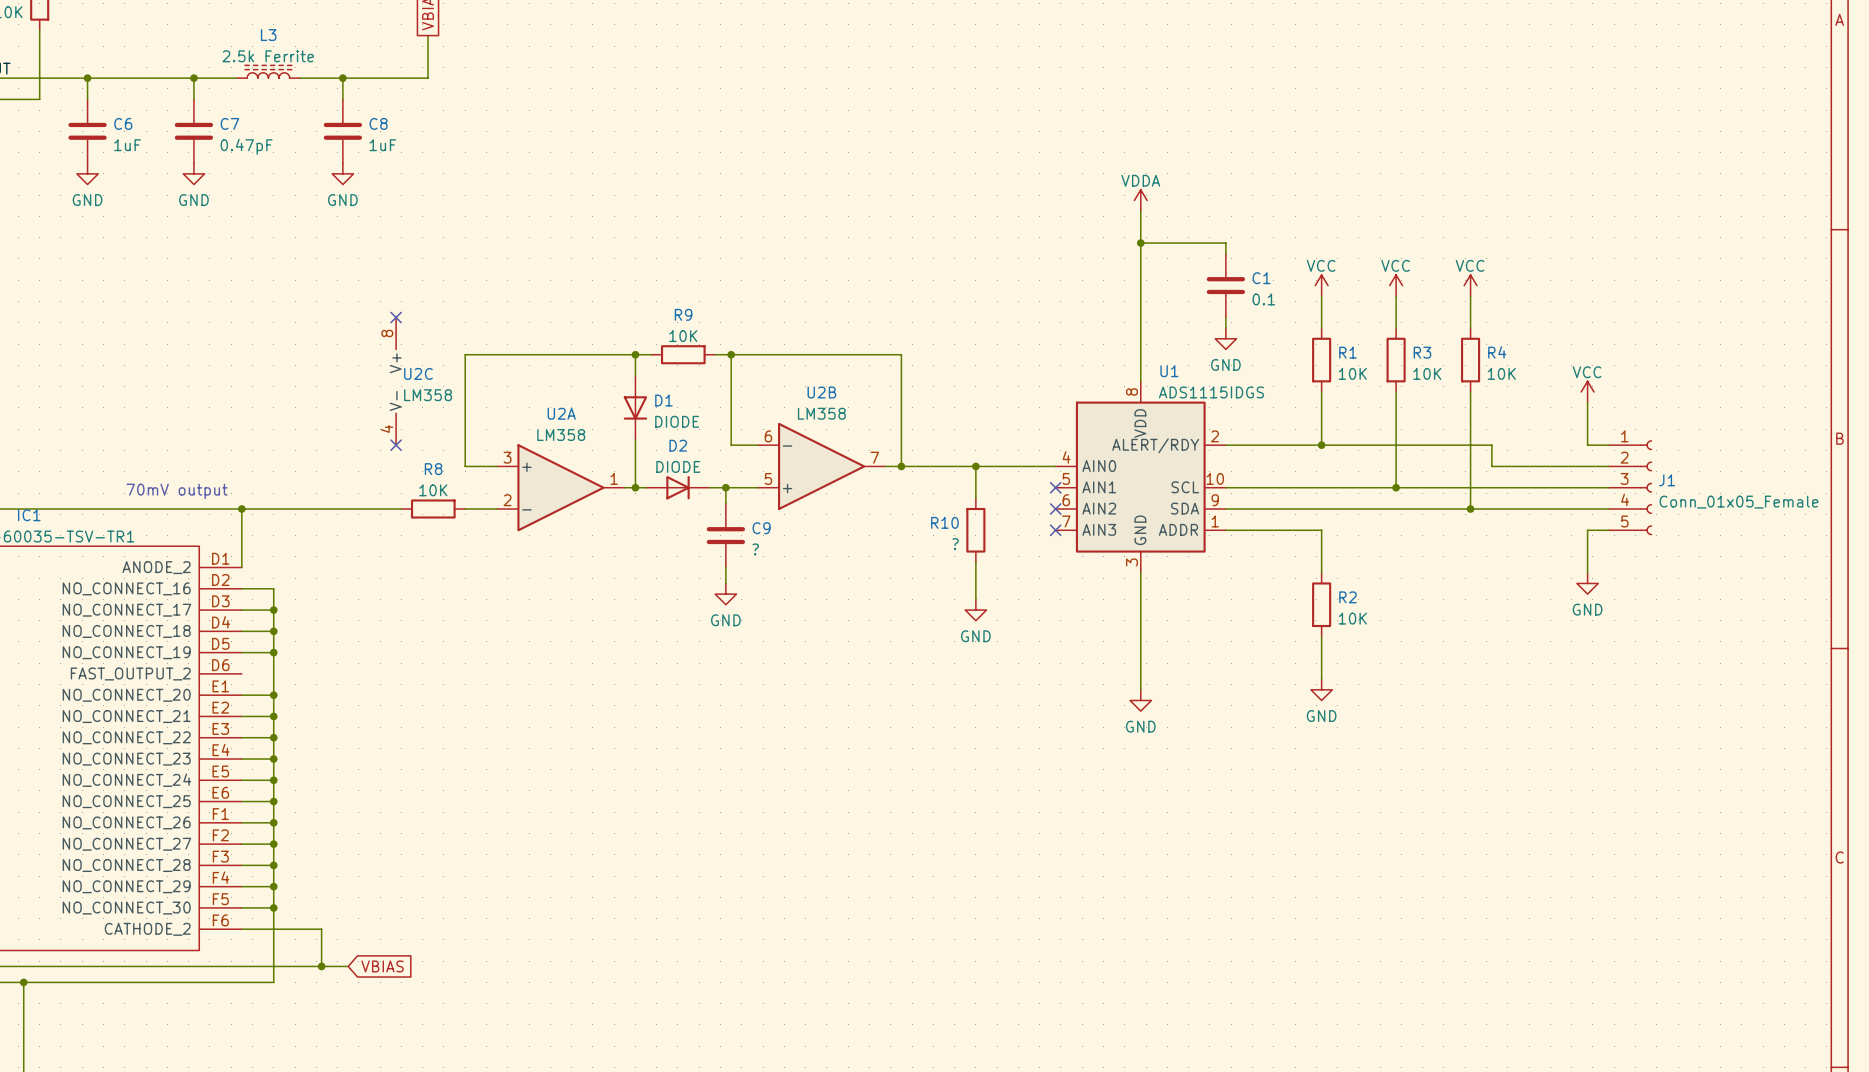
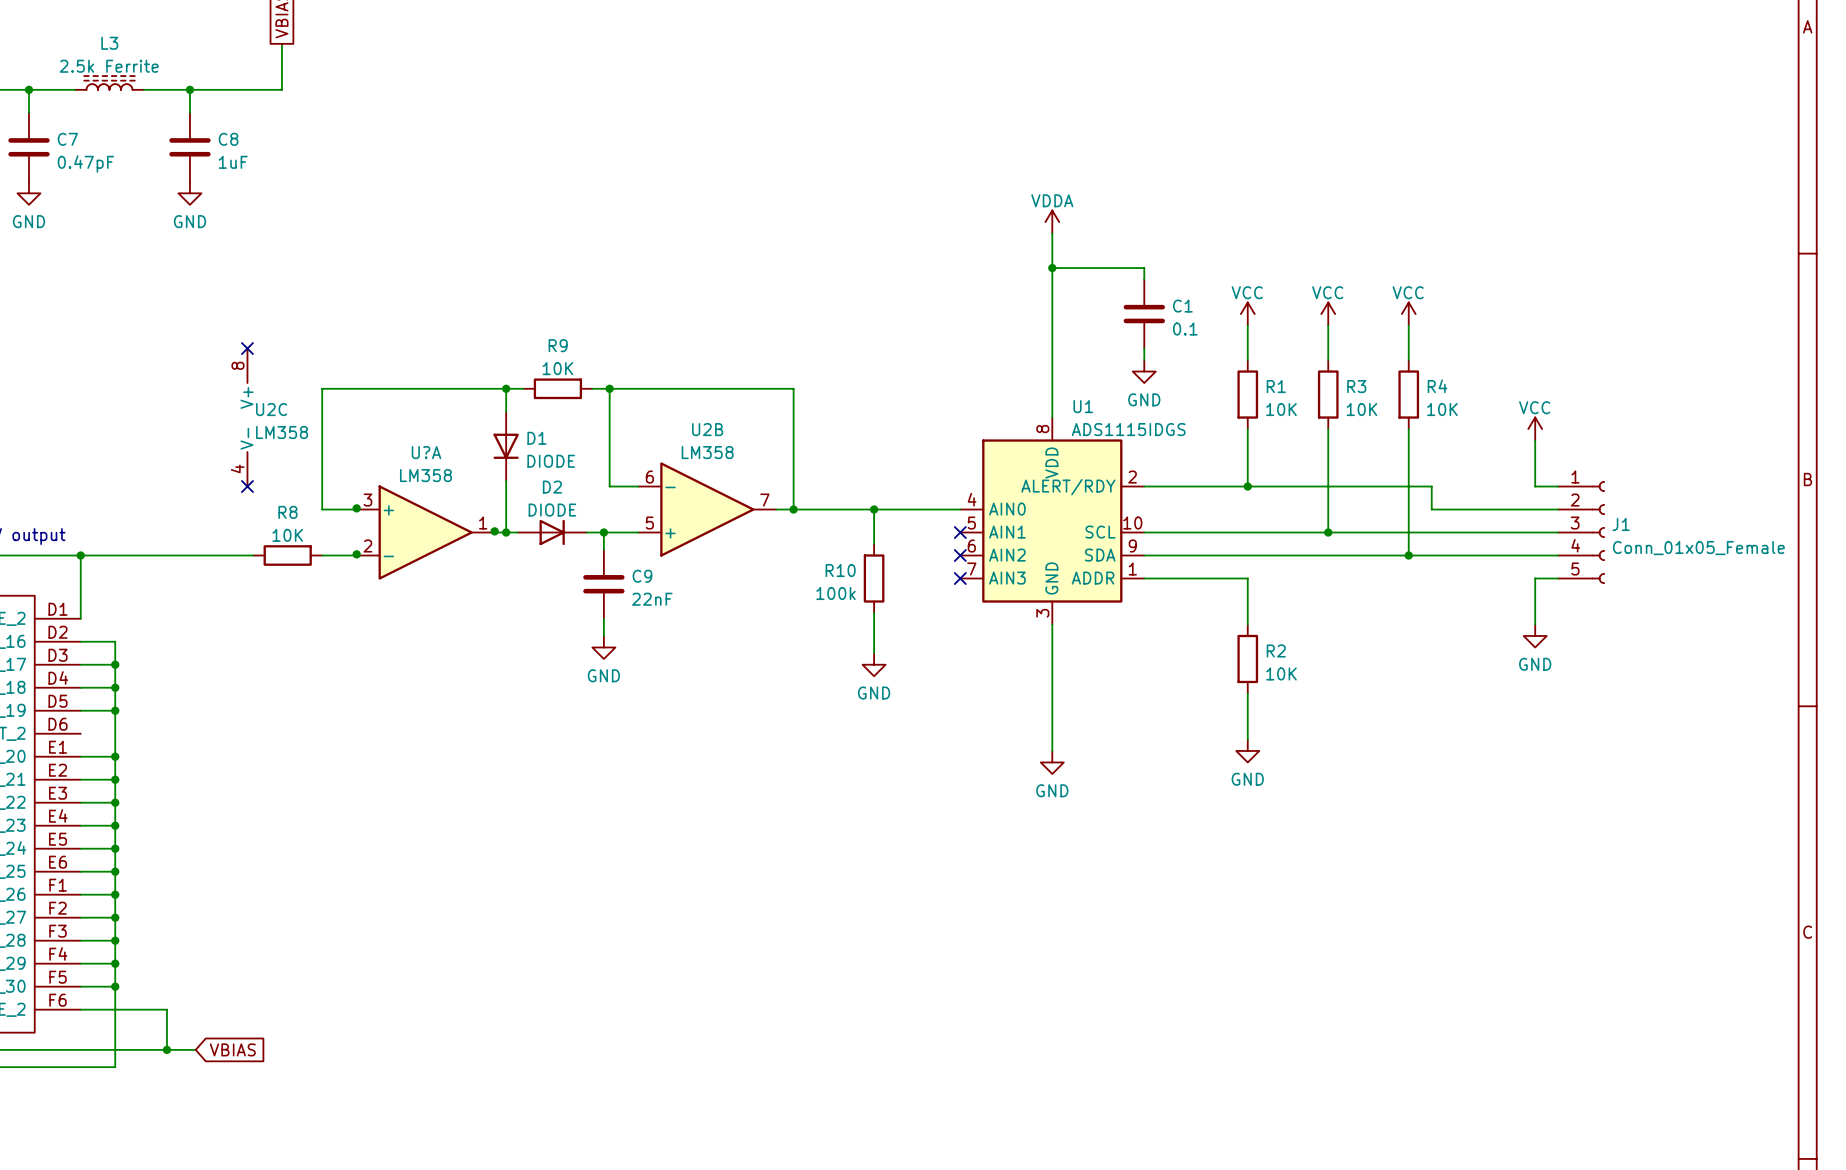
U2A name: U2A (561, 413) -> U?A (426, 452)
junction: none -> (356, 508)
junction: none -> (494, 531)
junction: none -> (356, 554)
R10 value: ? (955, 544) -> 100k (836, 593)
C9 value: ? (755, 549) -> 22nF (652, 599)

